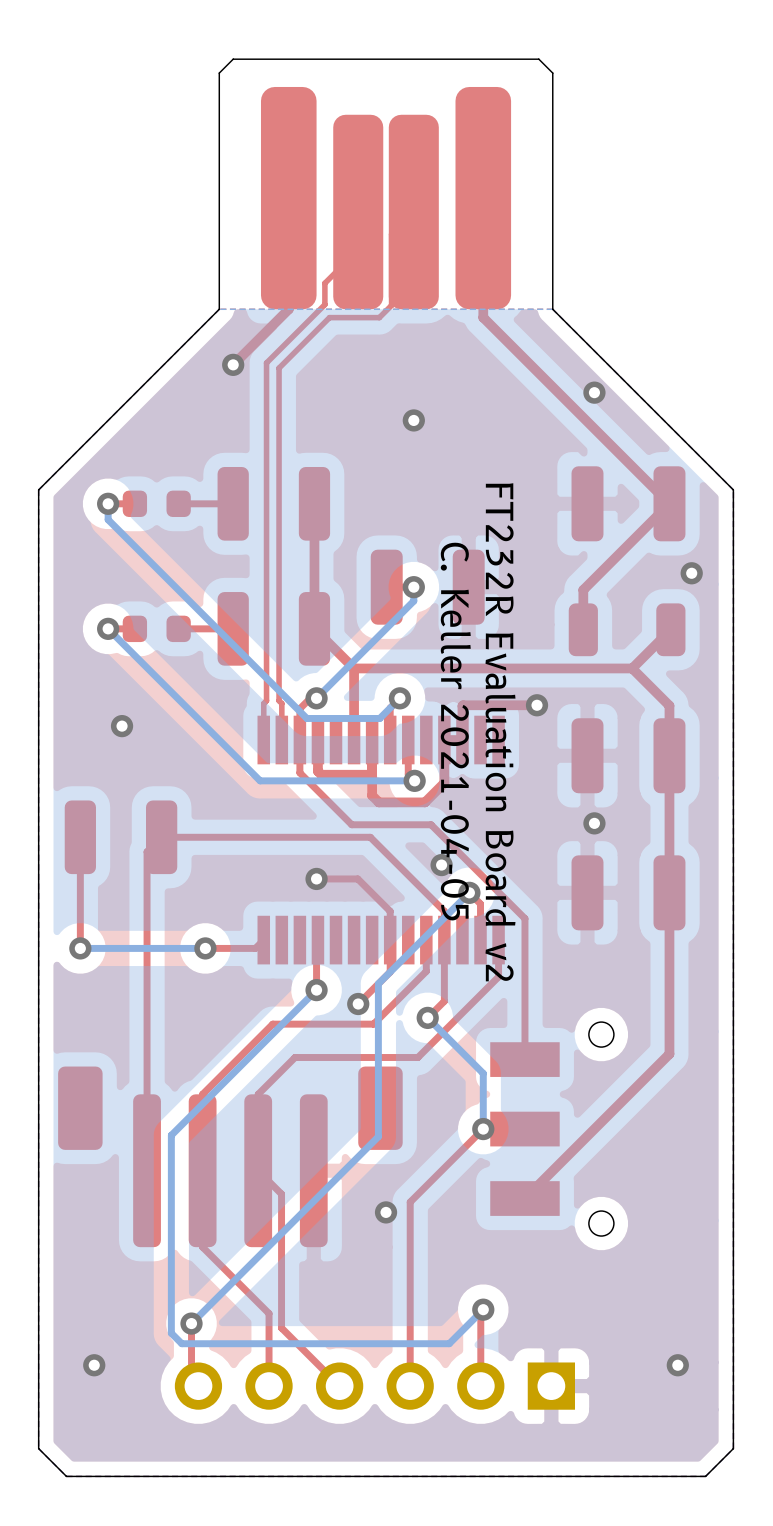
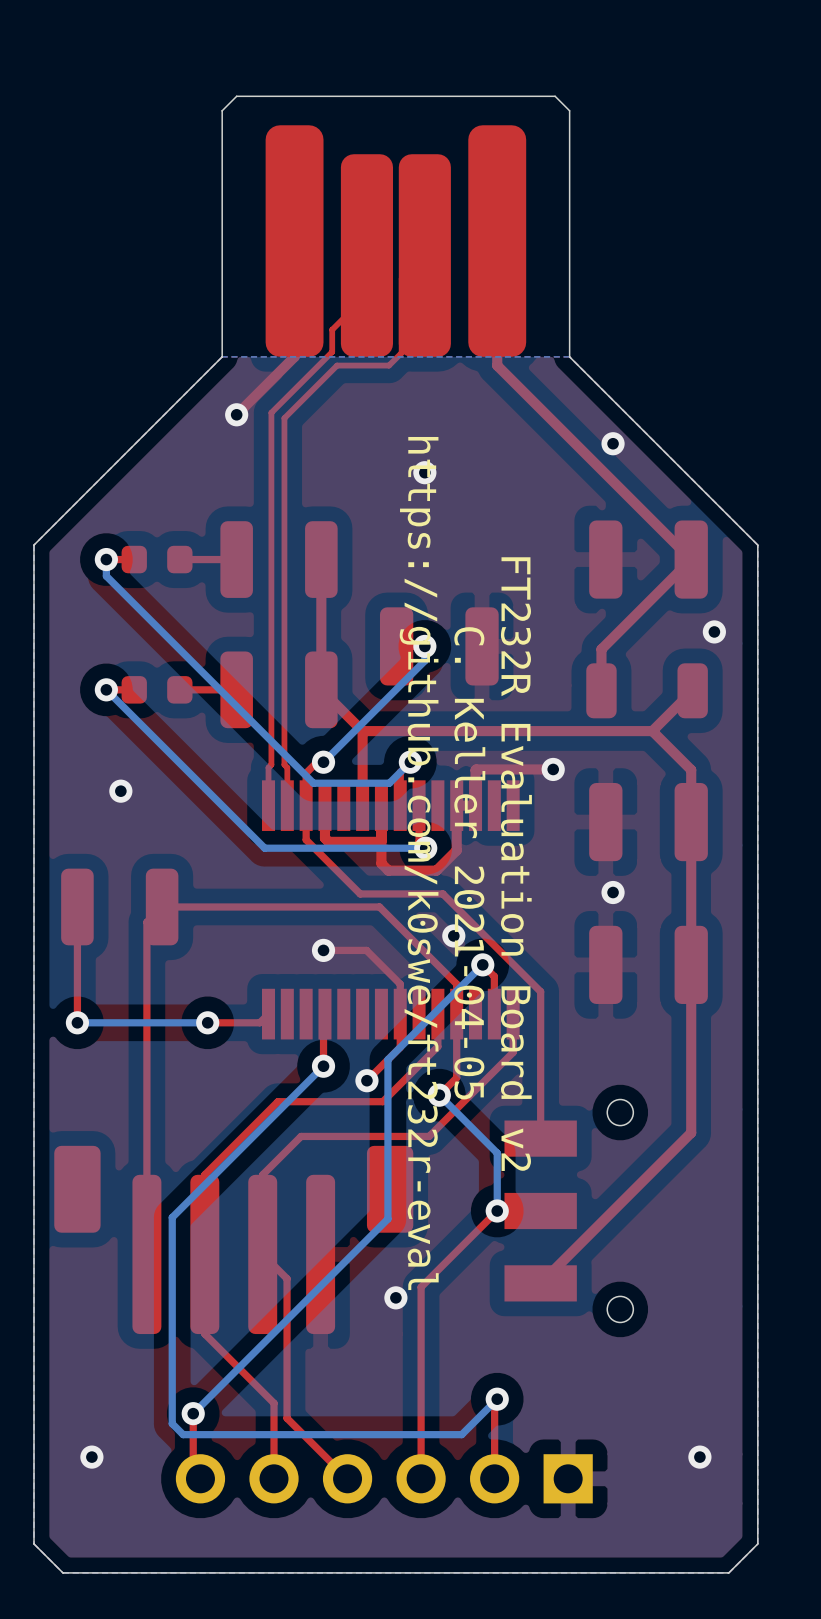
text position: C. Keller 2021-04-05 (455, 731) -> C. Keller 2021-04-05 (469, 863)
text position: FT232R Evaluation Board v2 (500, 732) -> FT232R Evaluation Board v2 (516, 864)
text: none -> https://github.com/k0swe/ft232r-eval (419, 863)

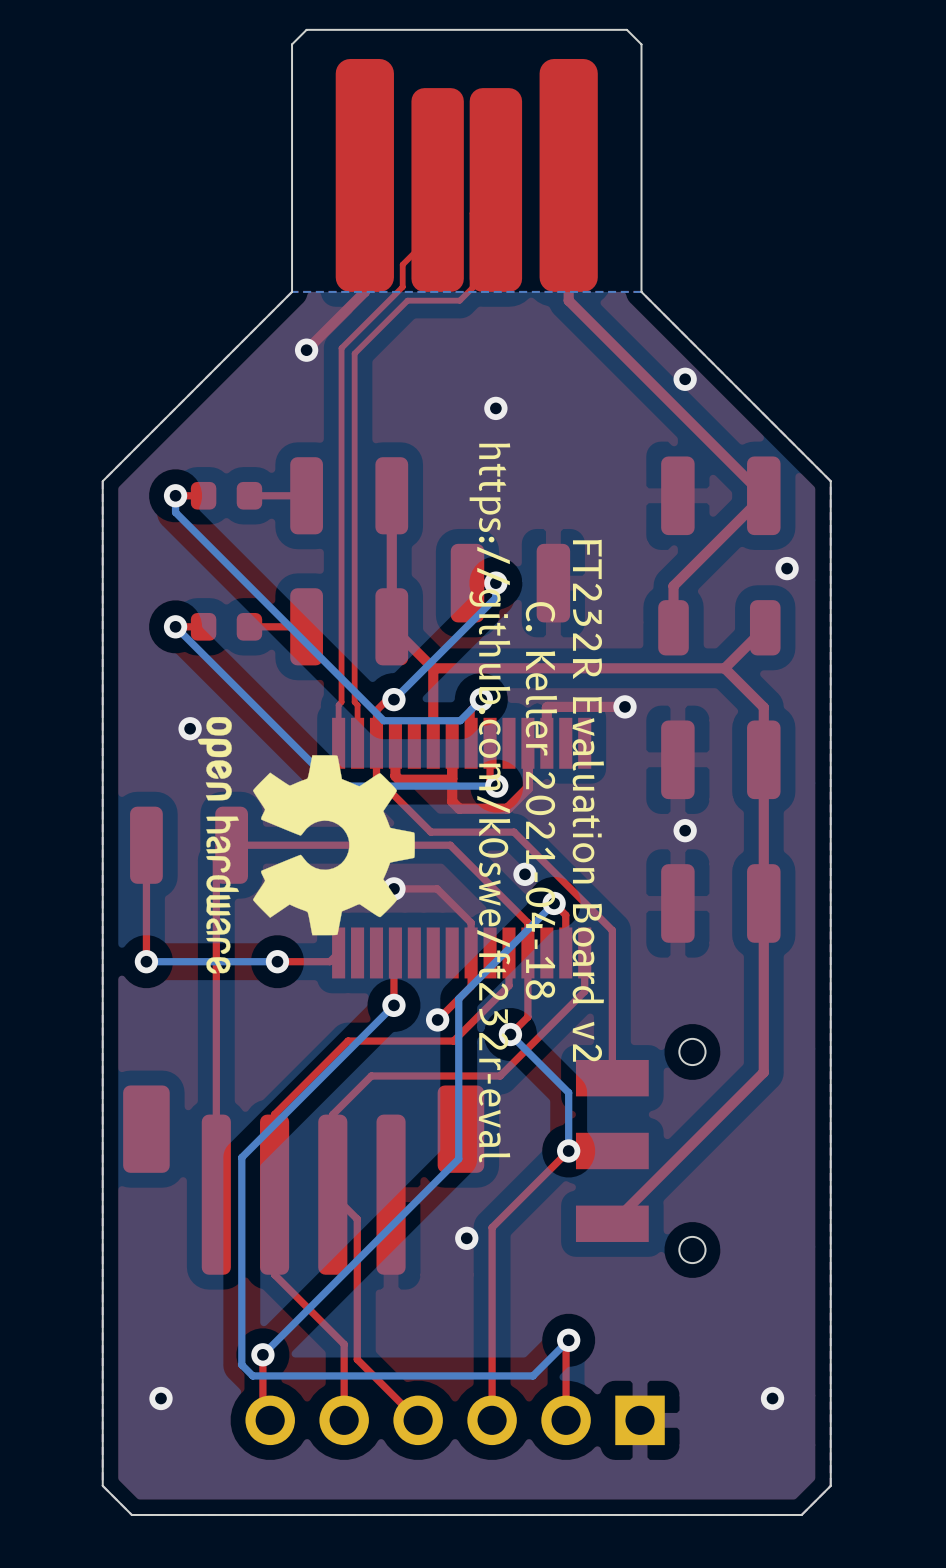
drawing: none -> [197, 717, 415, 974]
text: C. Keller 2021-04-05 (469, 863) -> C. Keller 2021-04-18 (541, 800)

